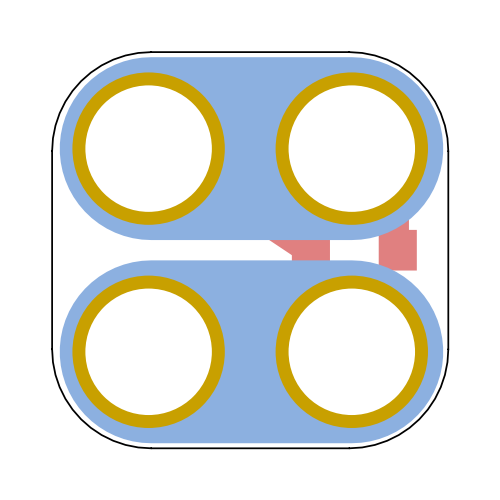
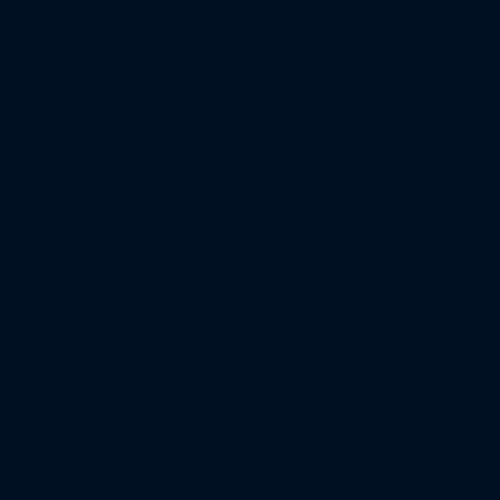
part: (250, 250) -> none

